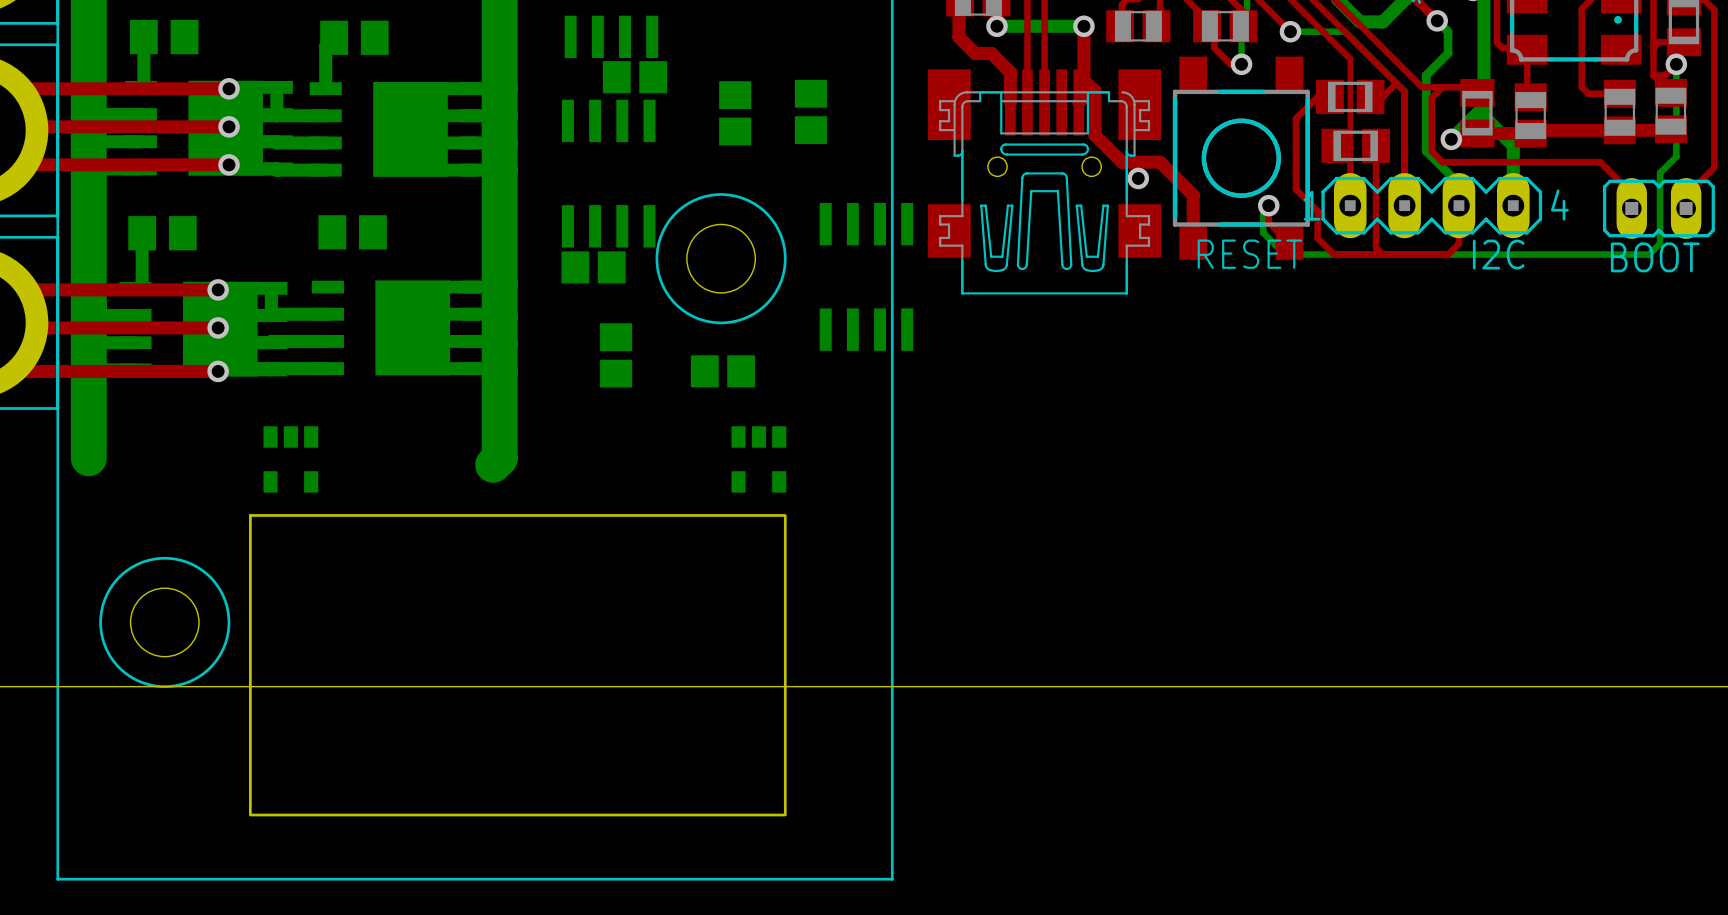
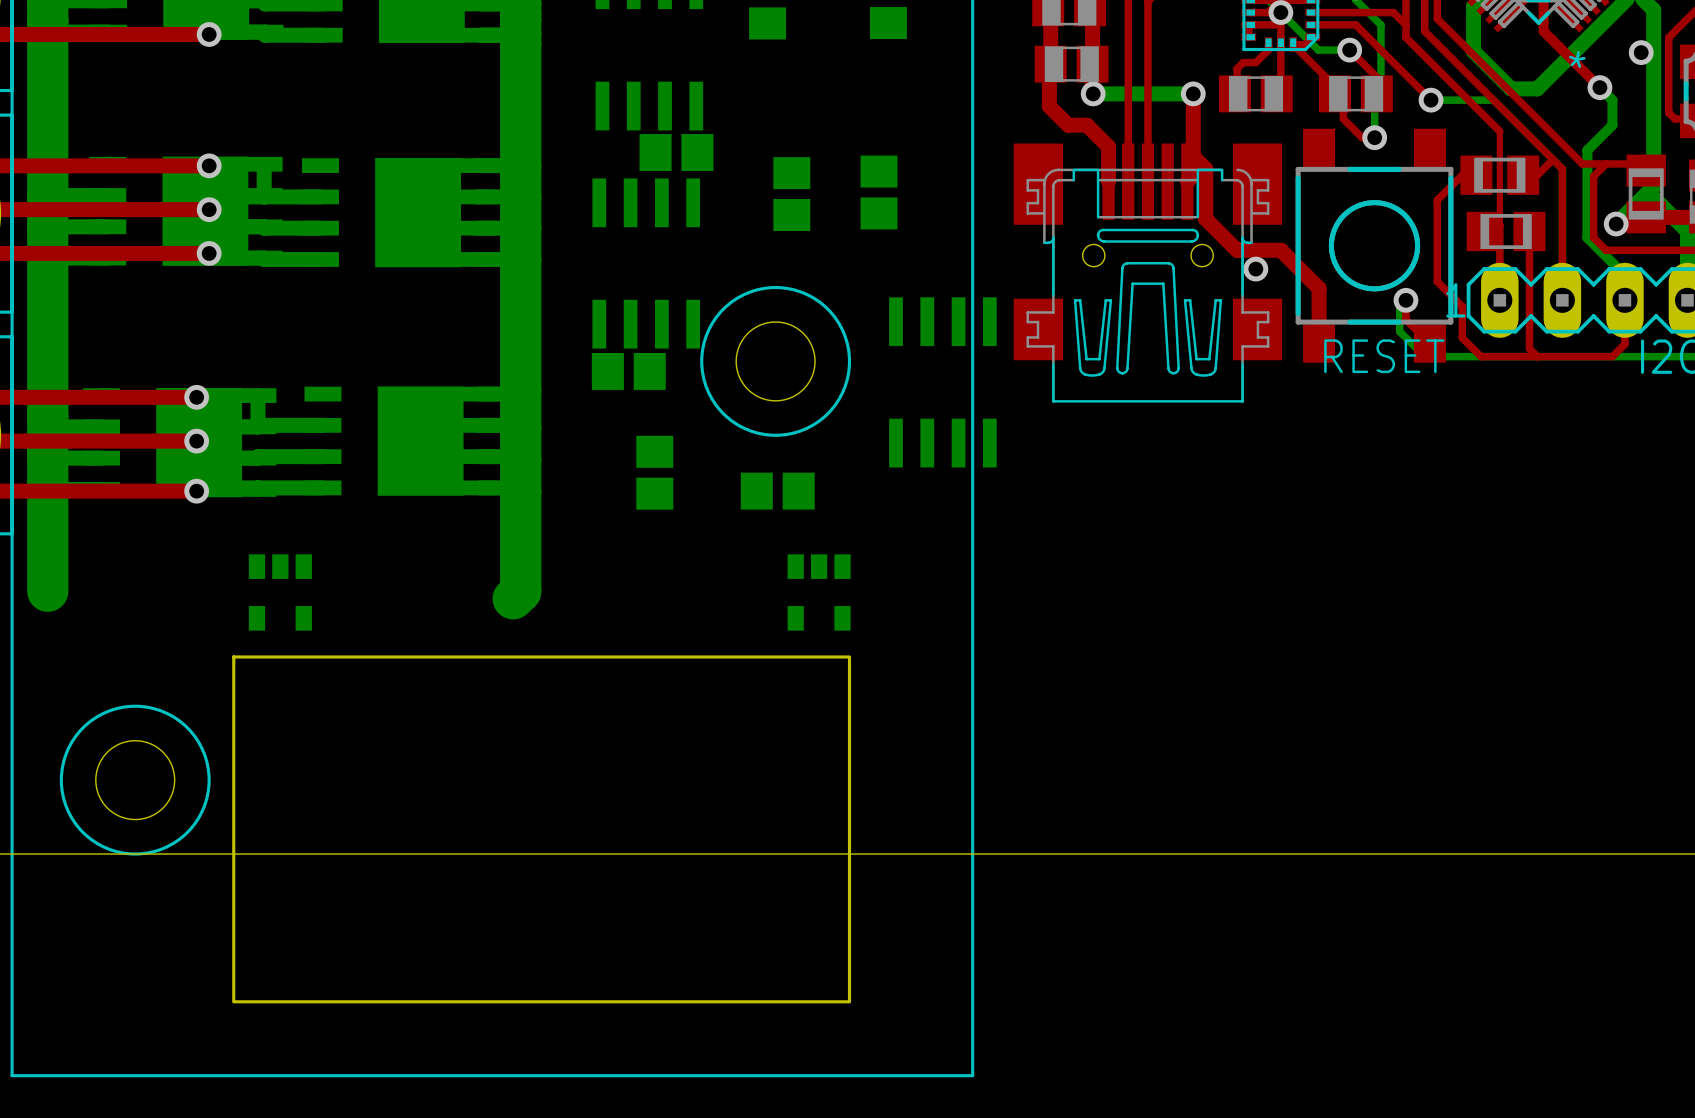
bottom track: (143, 37) (143, 87) -> none
part: (164, 37) -> none
bottom track: (334, 37) (325, 46) (325, 88) -> none
part: (354, 37) -> none
part: (352, 232) -> none
bottom track: (142, 233) (142, 288) -> none
part: (162, 233) -> none

